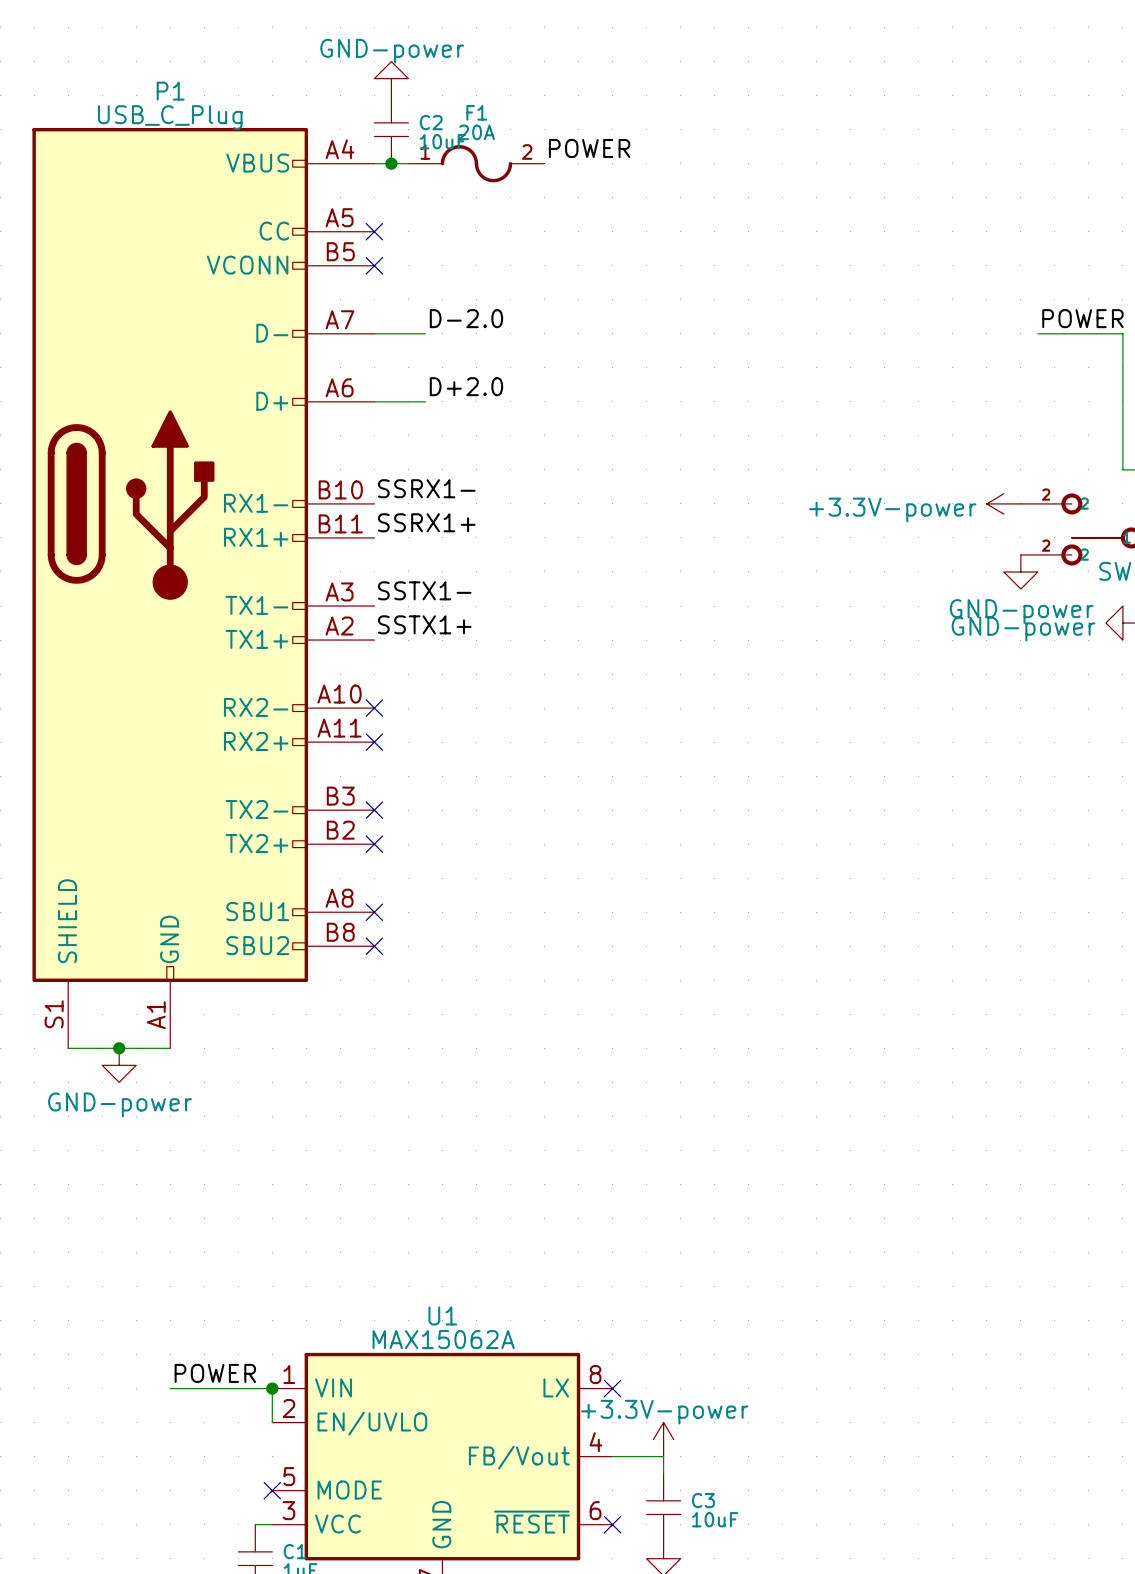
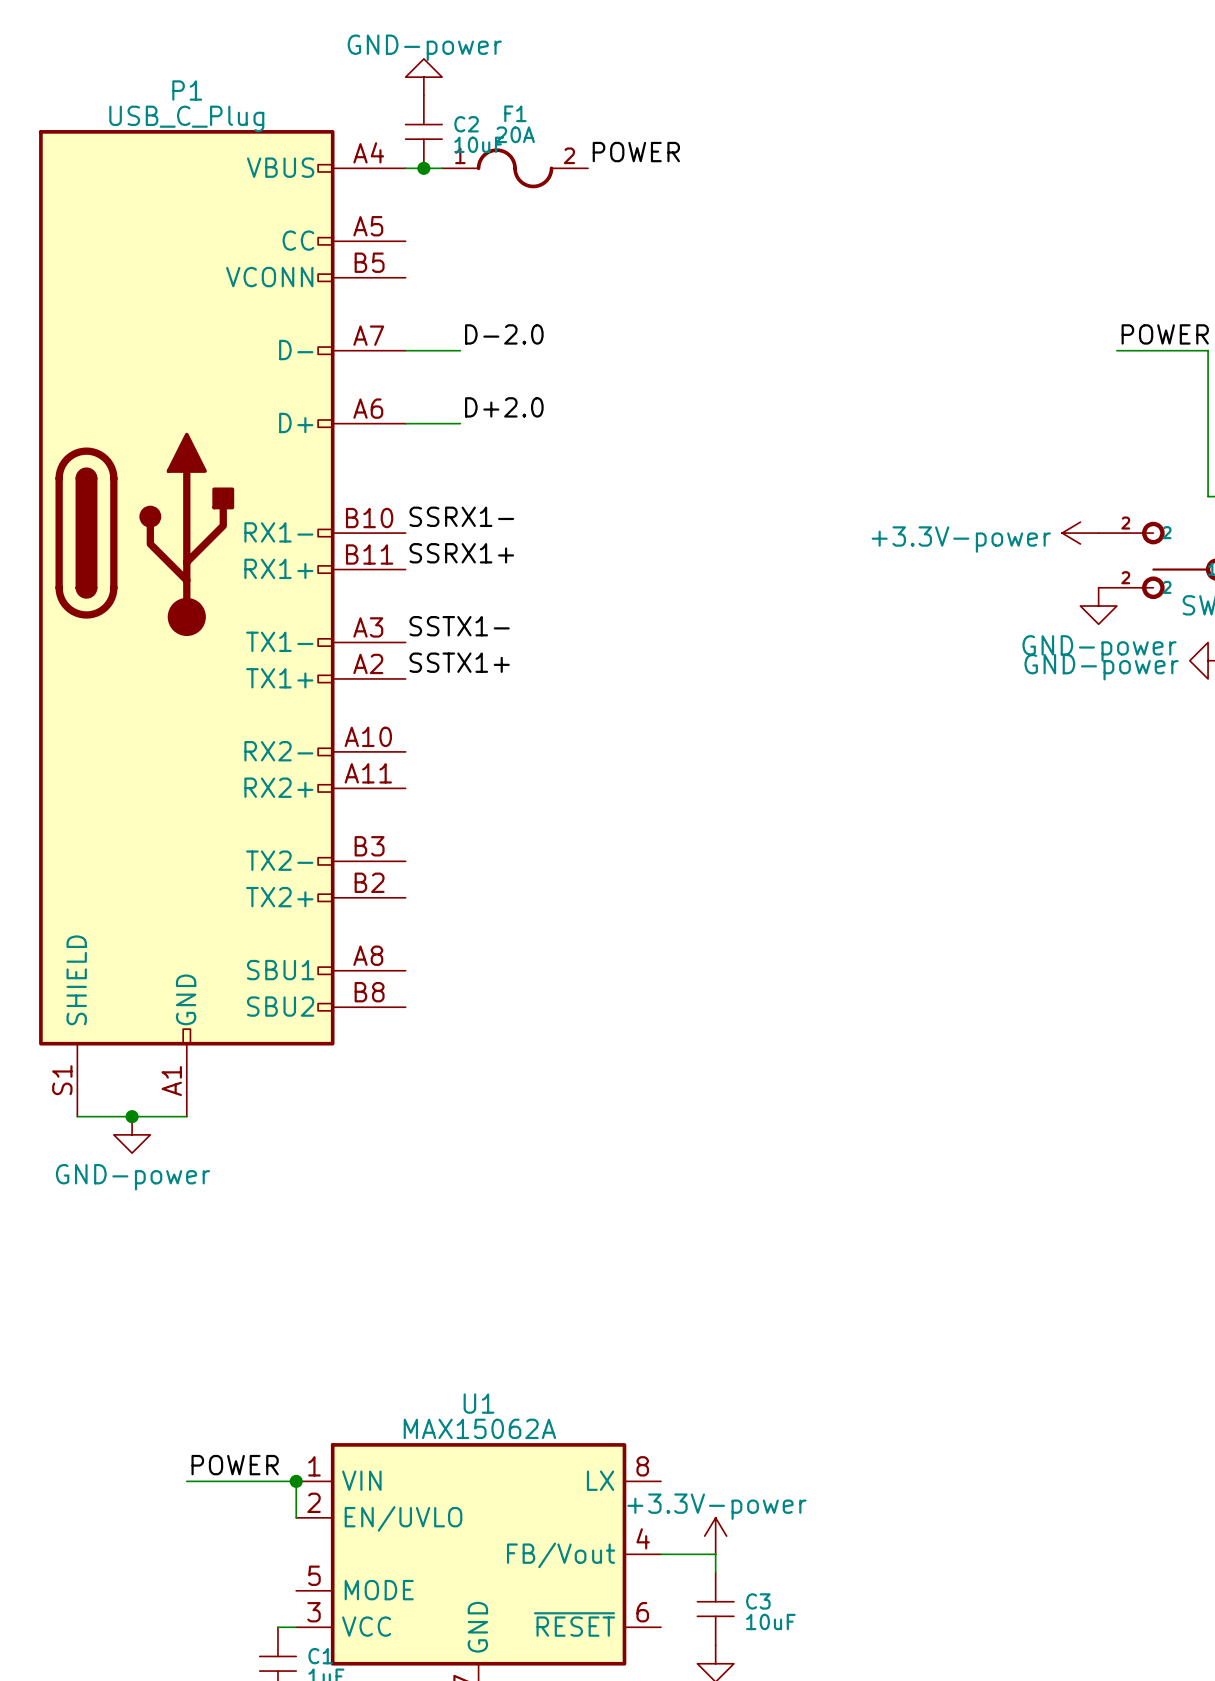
no-connect mark: (374, 231) -> none
no-connect mark: (374, 265) -> none
no-connect mark: (374, 708) -> none
no-connect mark: (374, 742) -> none
no-connect mark: (374, 810) -> none
no-connect mark: (374, 844) -> none
no-connect mark: (374, 912) -> none
no-connect mark: (374, 946) -> none
no-connect mark: (612, 1388) -> none
no-connect mark: (272, 1490) -> none
no-connect mark: (612, 1524) -> none

